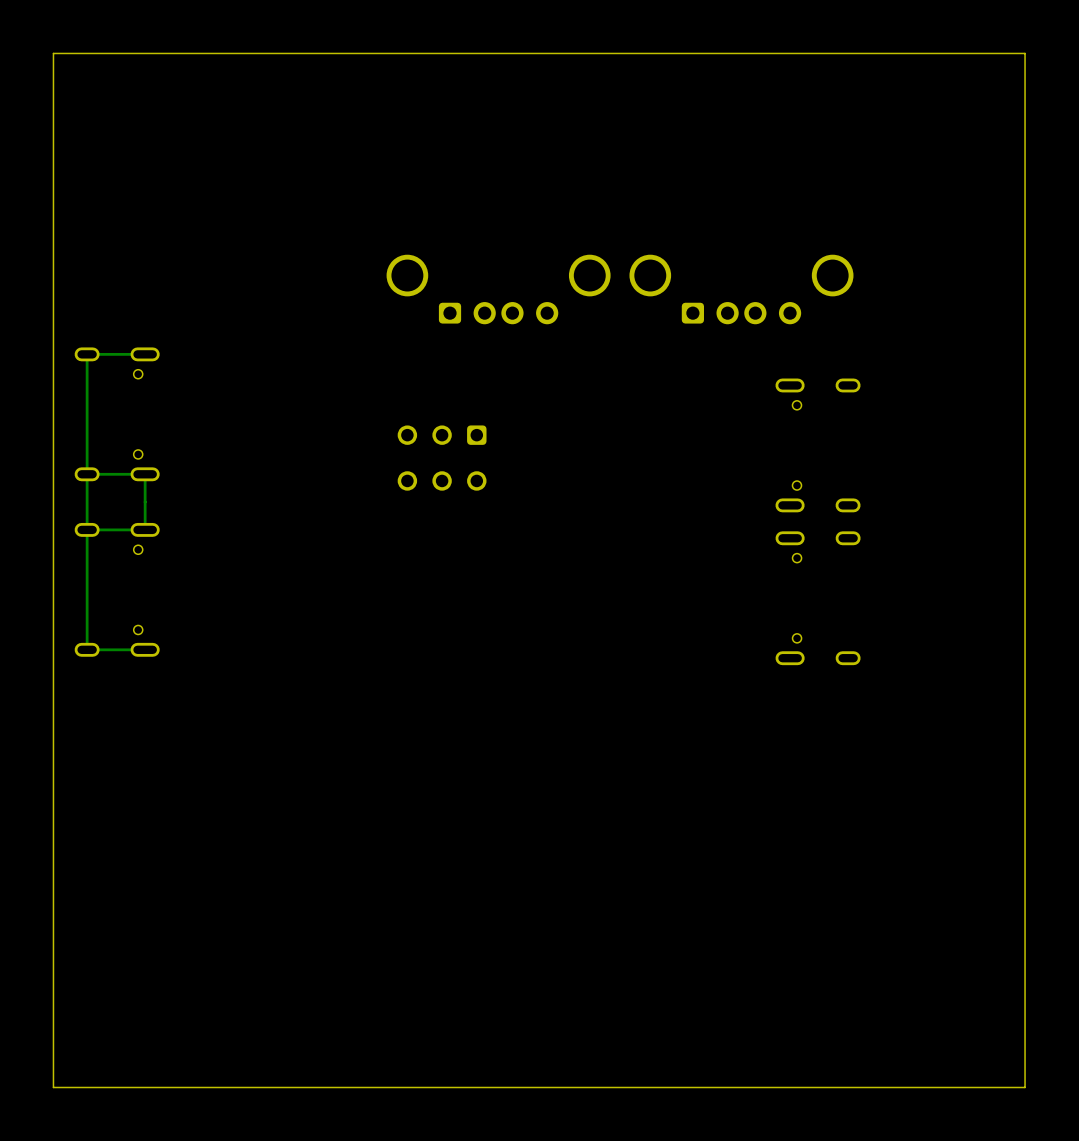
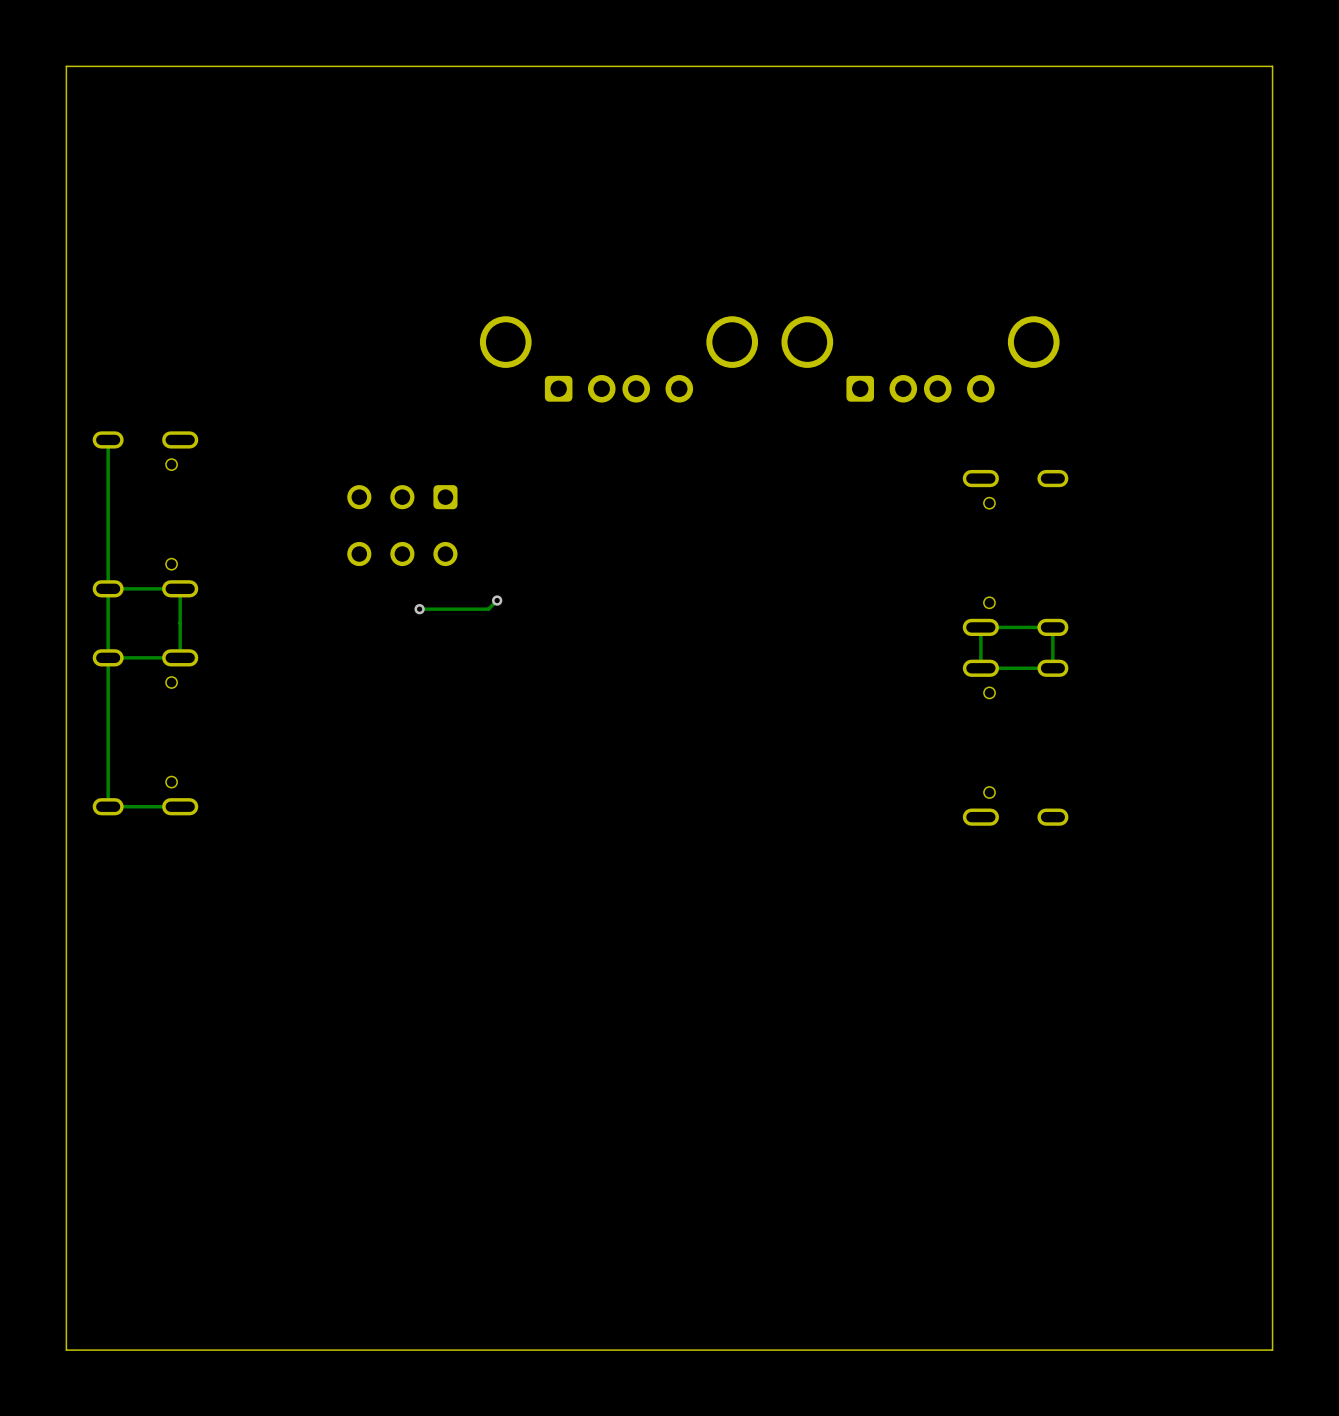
track: (145, 354) (87, 354) -> none
part position: (442, 458) -> (402, 525)
track: none -> (497, 600) (488, 609) (419, 609)
via: none -> (497, 600)
via: none -> (419, 609)
track: none -> (1052, 627) (1052, 668) (980, 668) (980, 627) (1052, 627)

